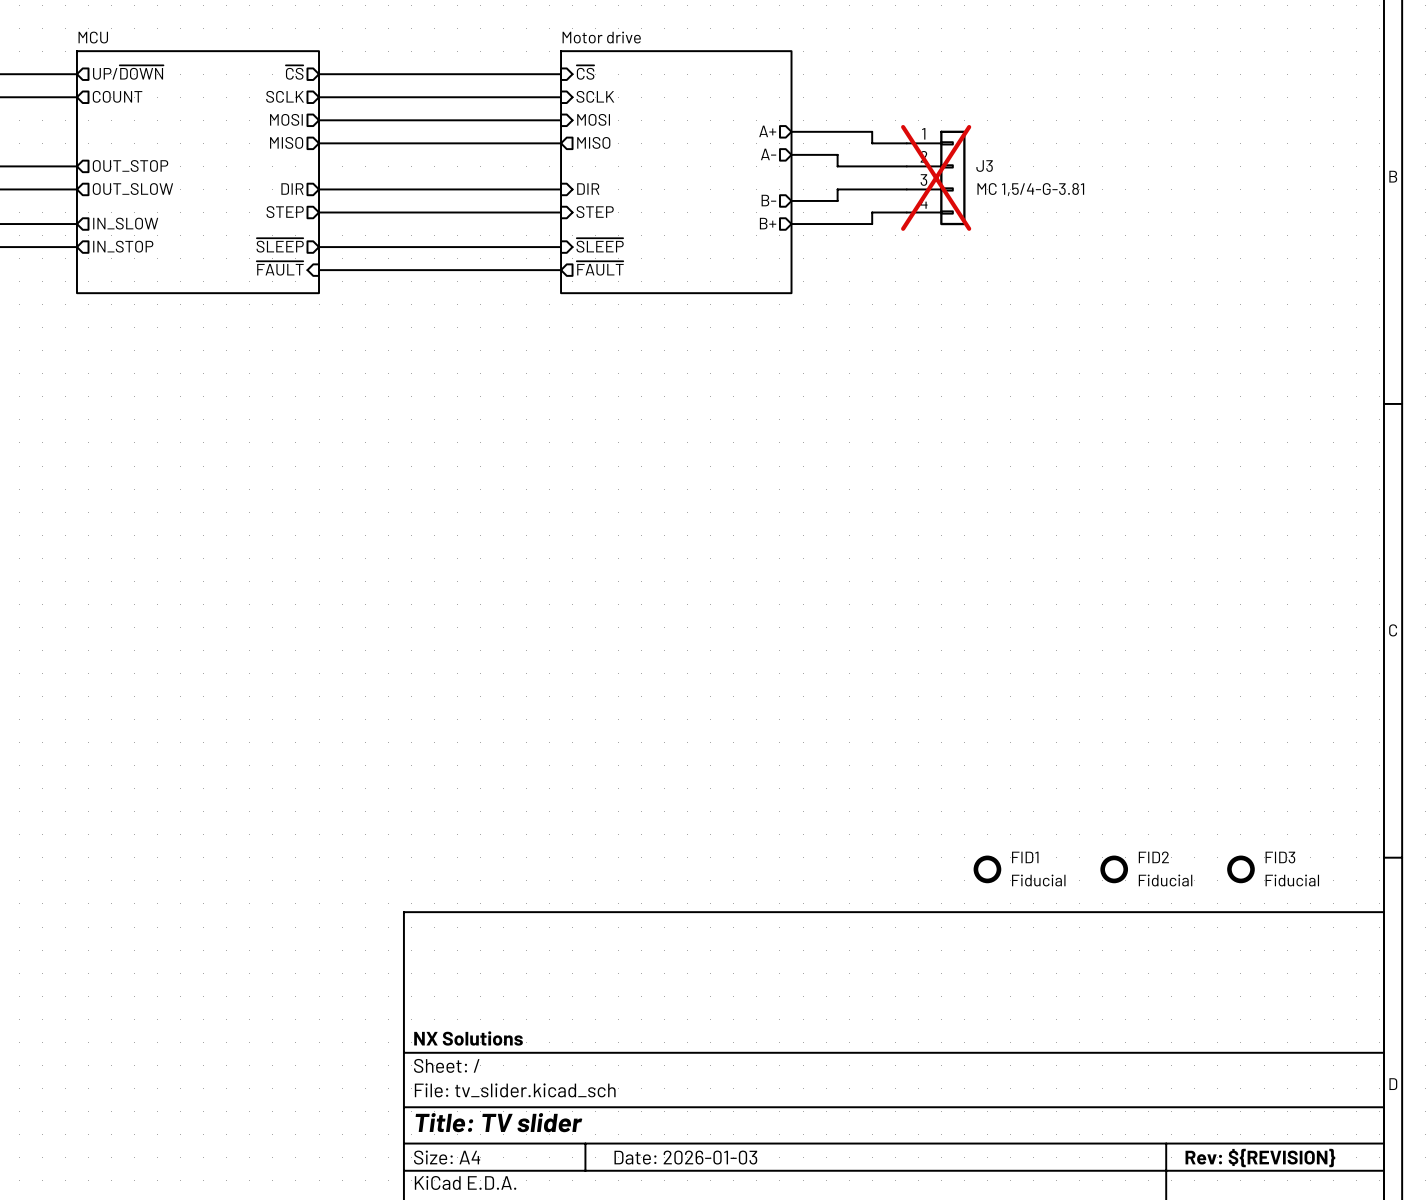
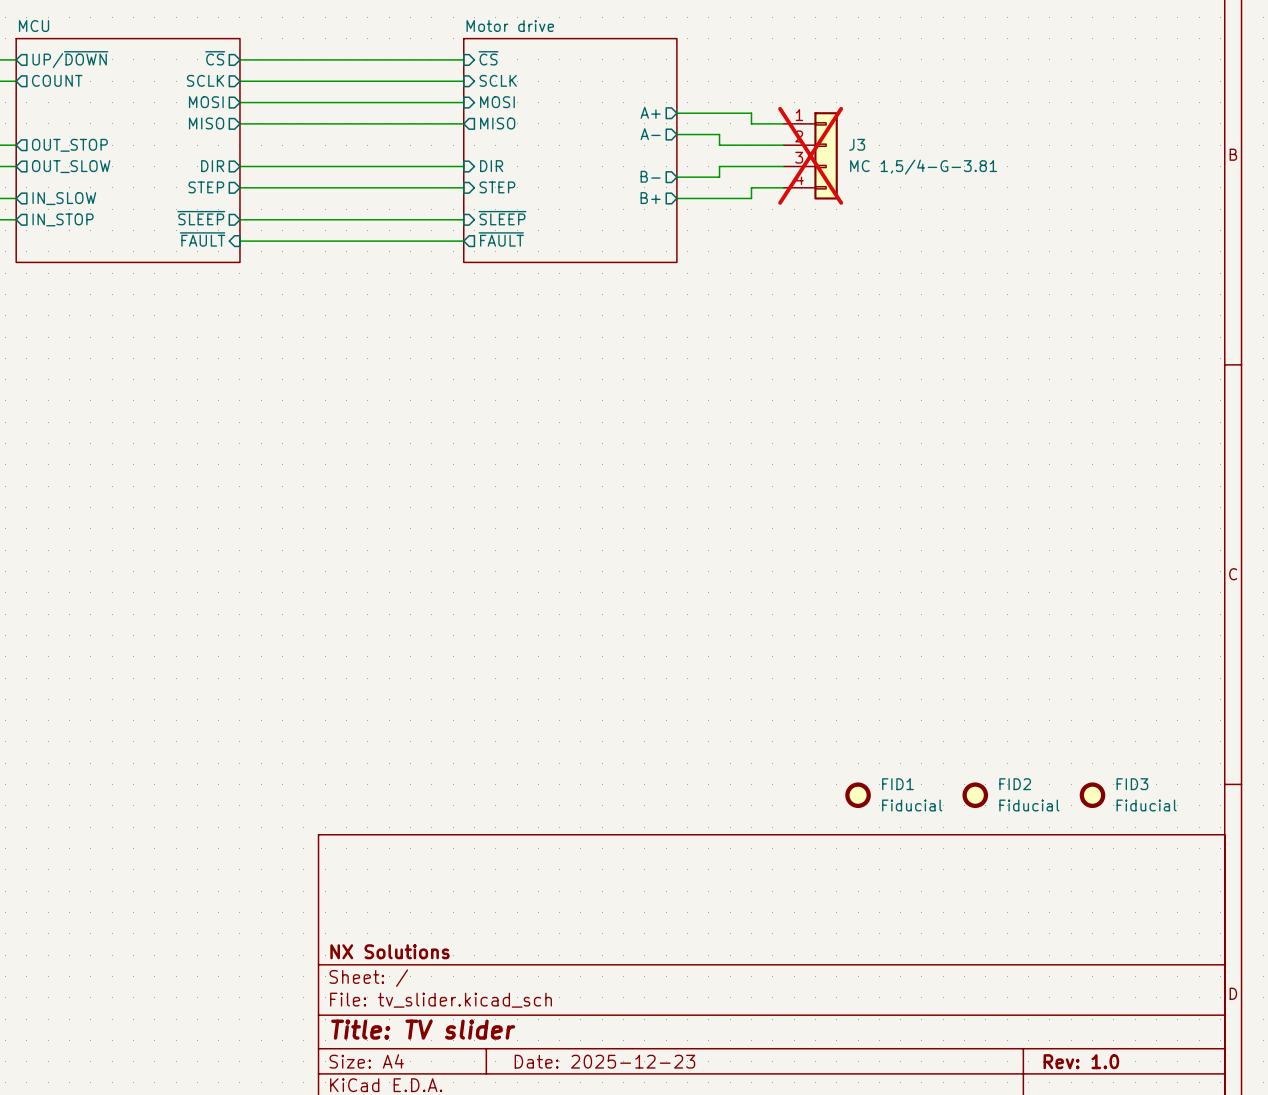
title block: Date: 2026-01-03 (685, 1157) -> Date: 2025-12-23 (604, 1061)
title block: Rev: ${REVISION} (1260, 1158) -> Rev: 1.0 (1081, 1061)

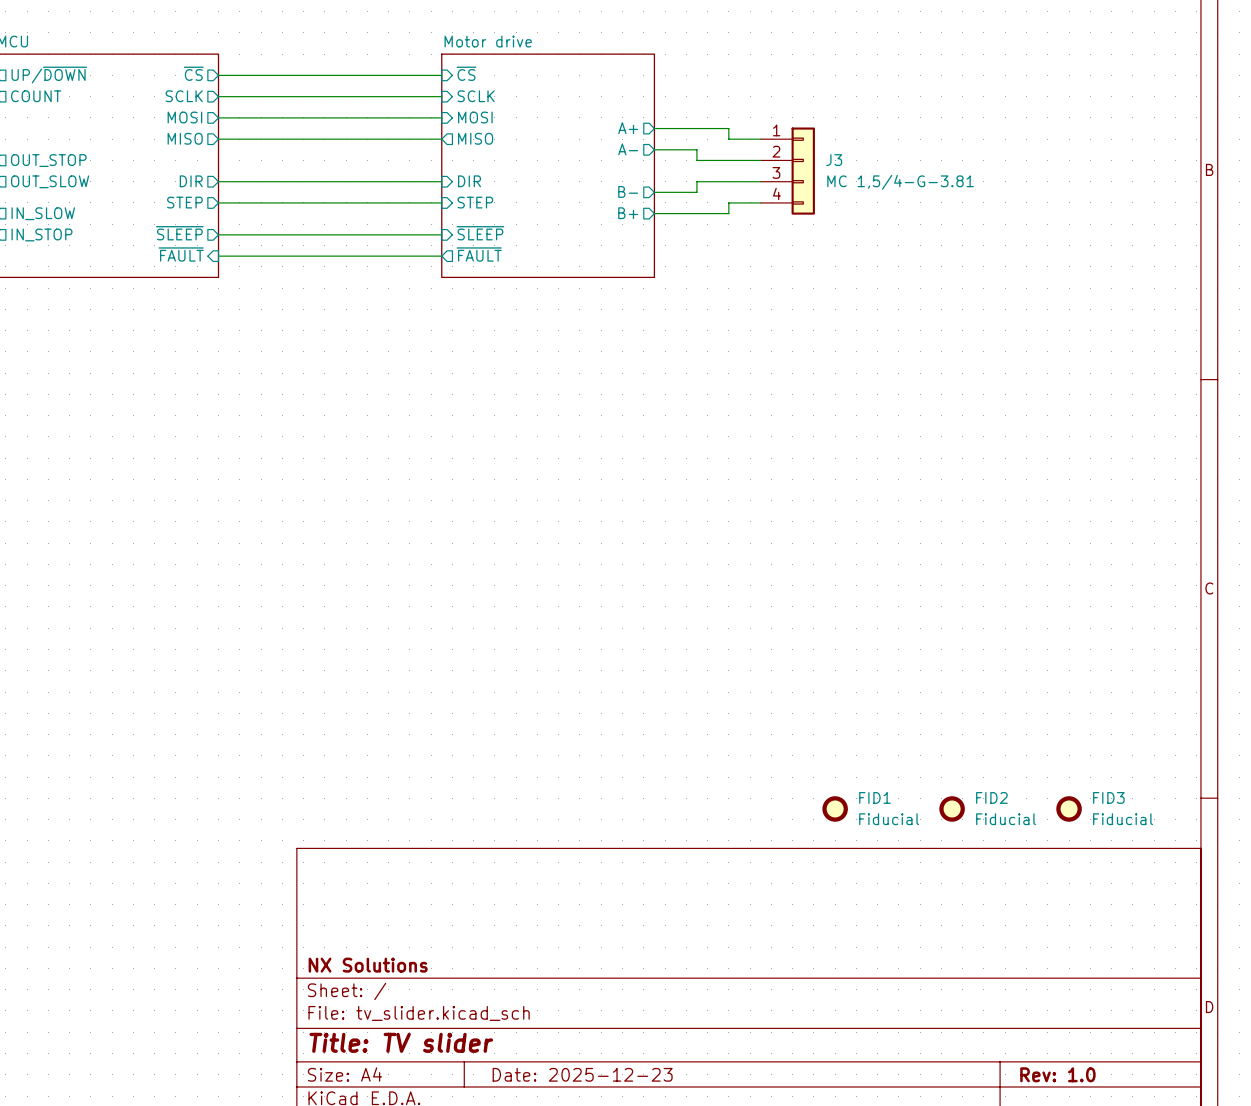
J3 do-not-place cross: (810, 155) -> none

